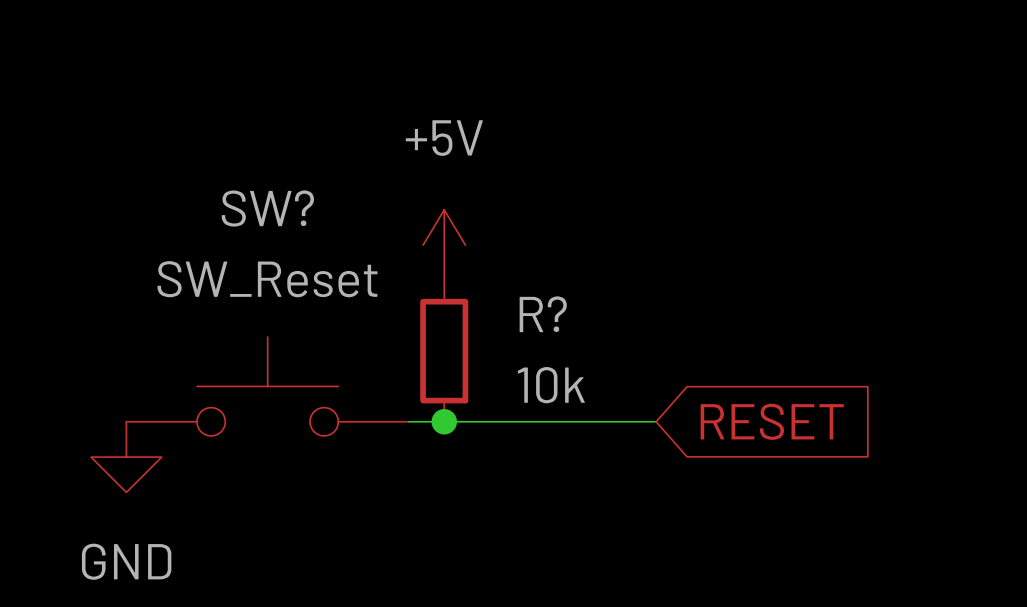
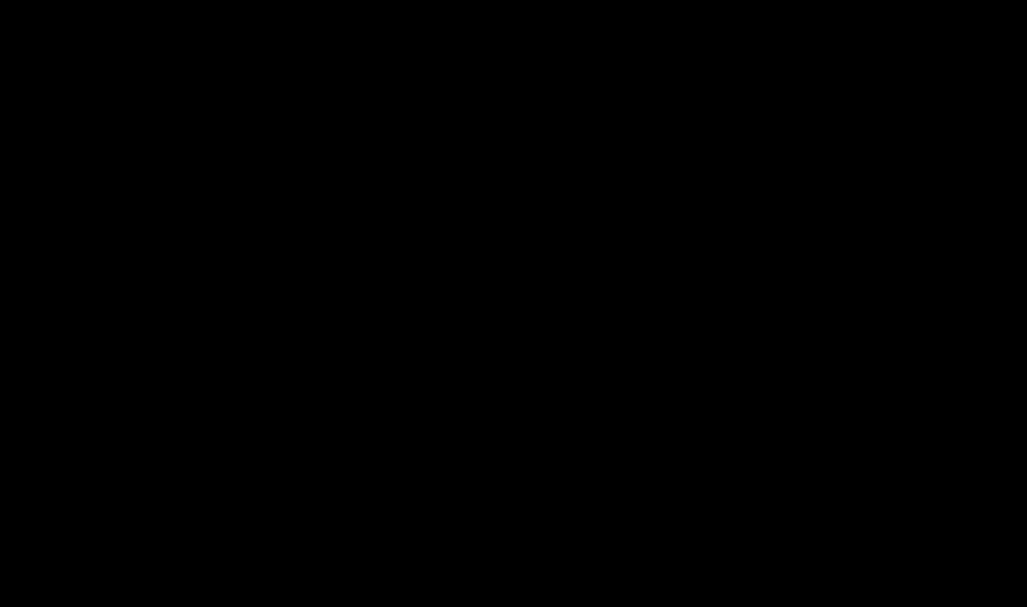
power symbol: +5V (444, 245) -> none
R?: 10k (444, 351) -> none
SW?: SW_Reset (267, 386) -> none
wire: (408, 421) (656, 421) -> none
junction: (444, 421) -> none
global label: RESET (772, 421) -> none
power symbol: GND (126, 457) -> none

